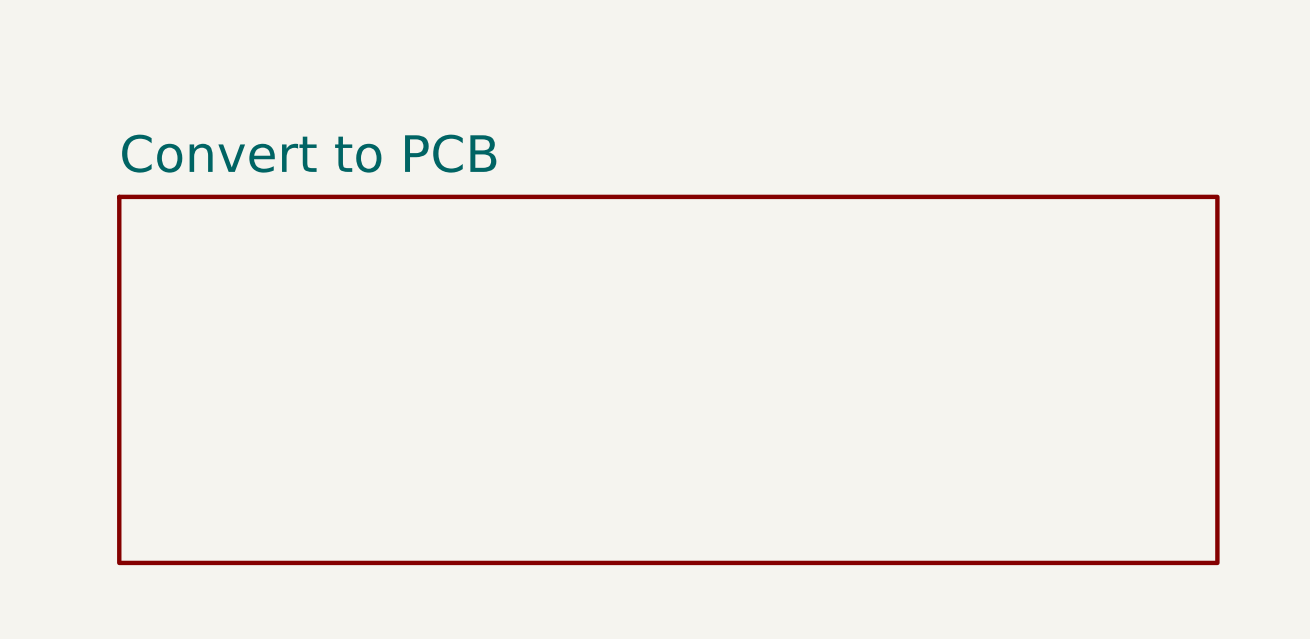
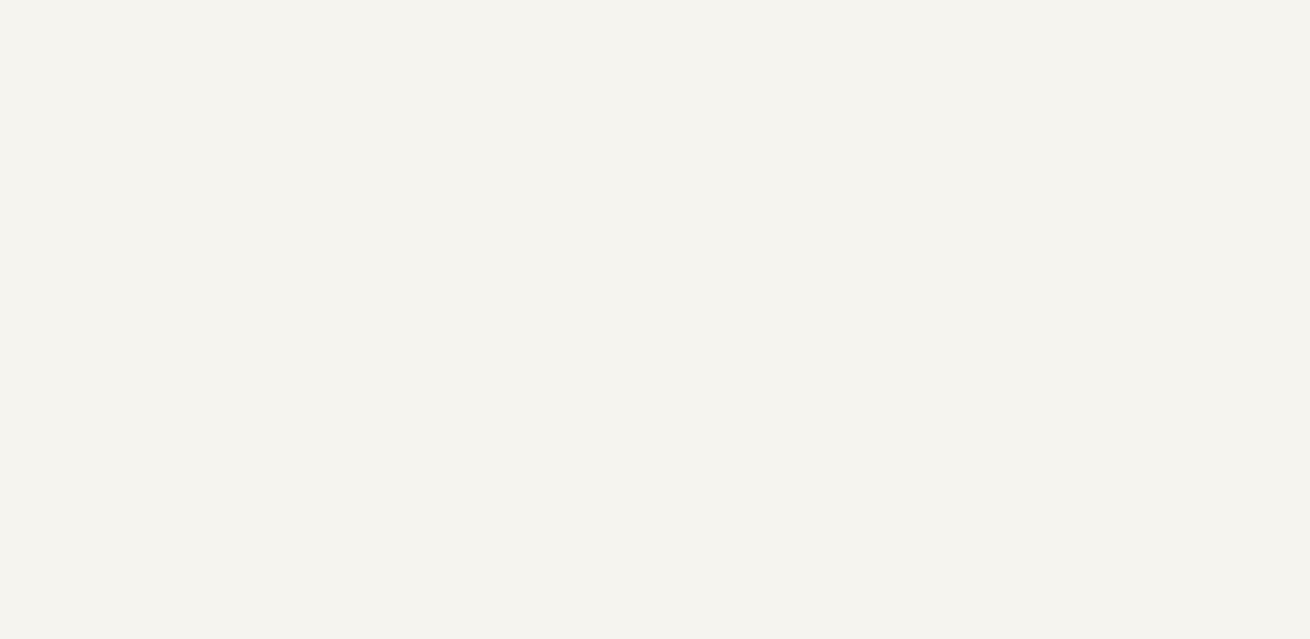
sheet Convert to PCB: (668, 379) -> none

